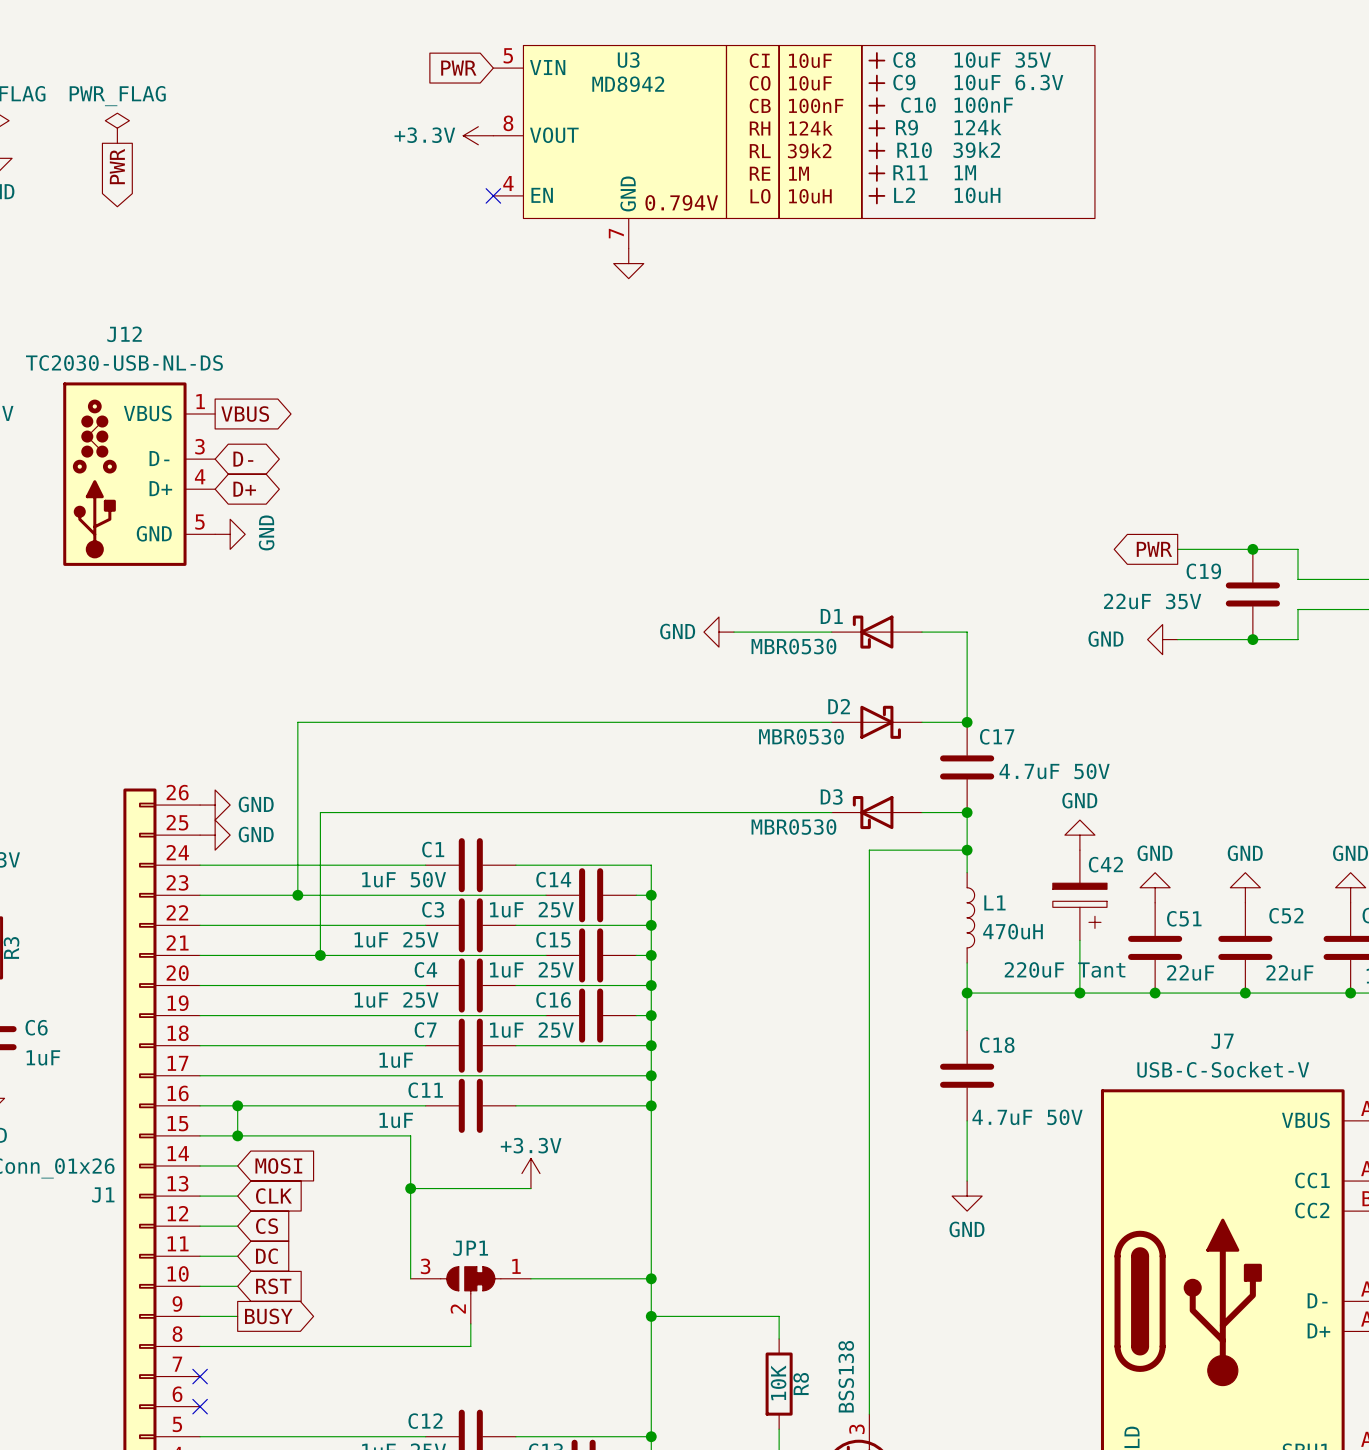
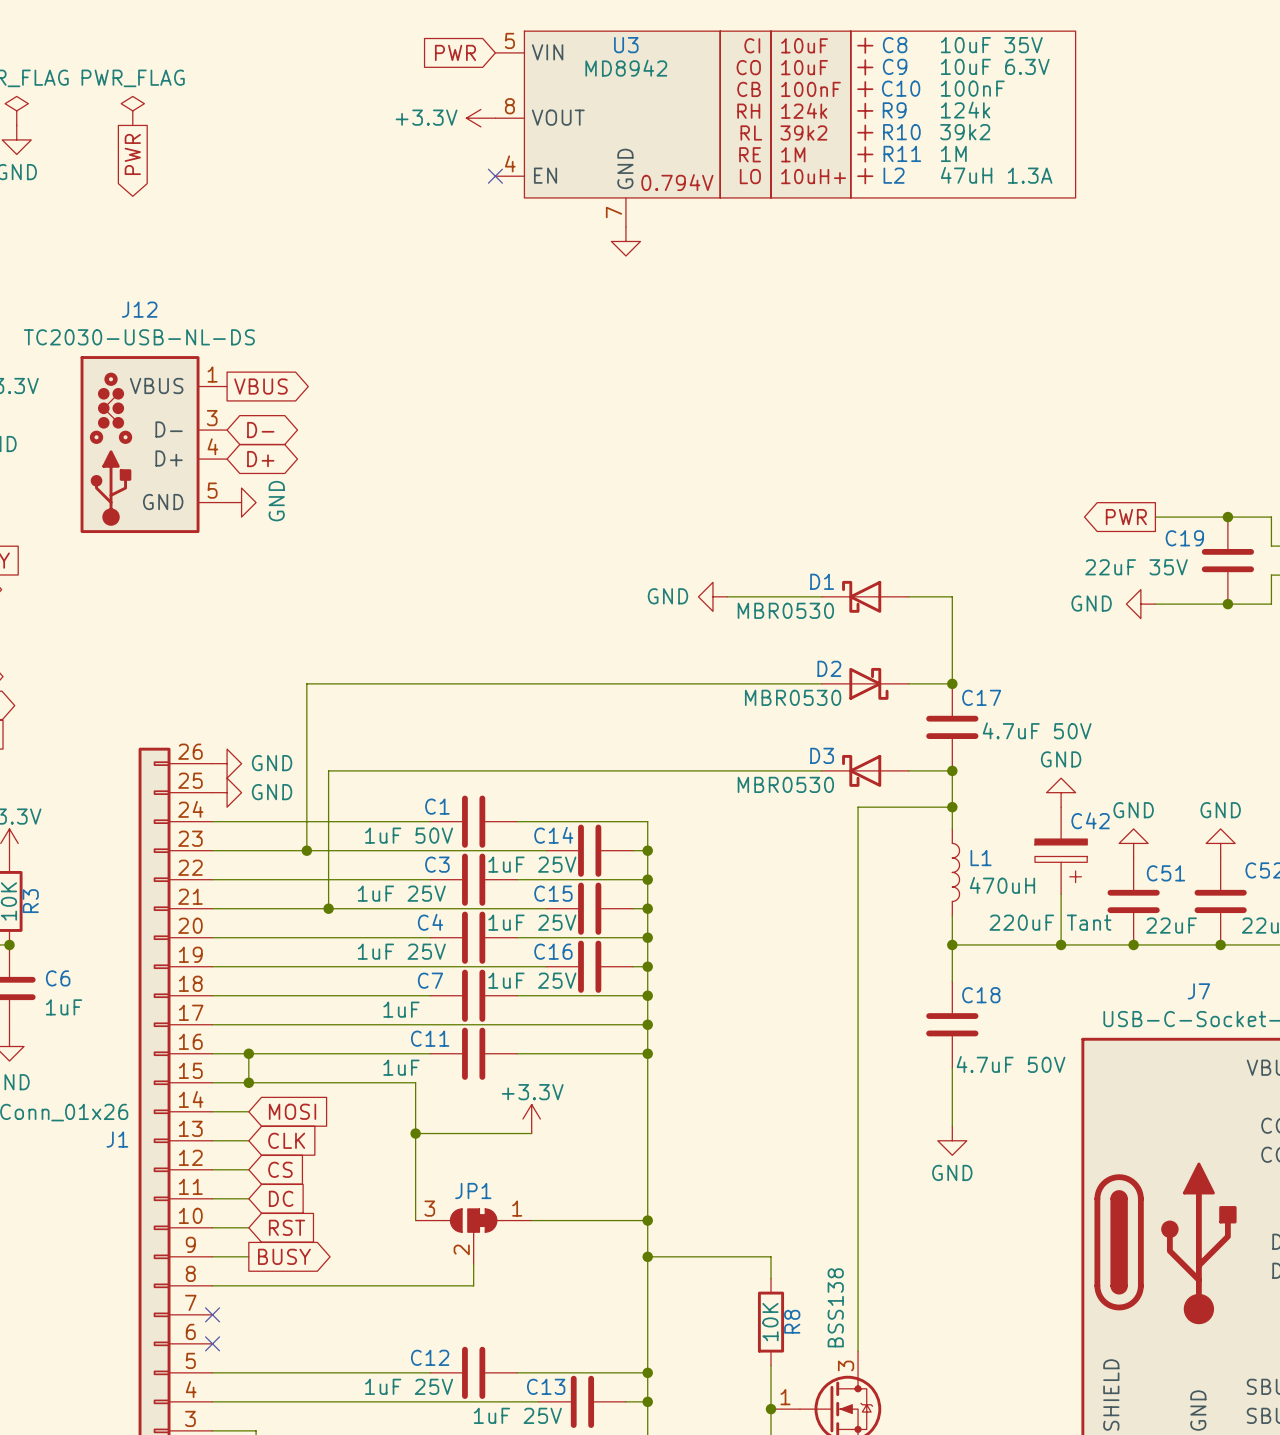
L2 value: 10uH (977, 195) -> 47uH 1.3A (996, 175)
U3 text: 10uH (810, 196) -> 10uH+ (813, 176)

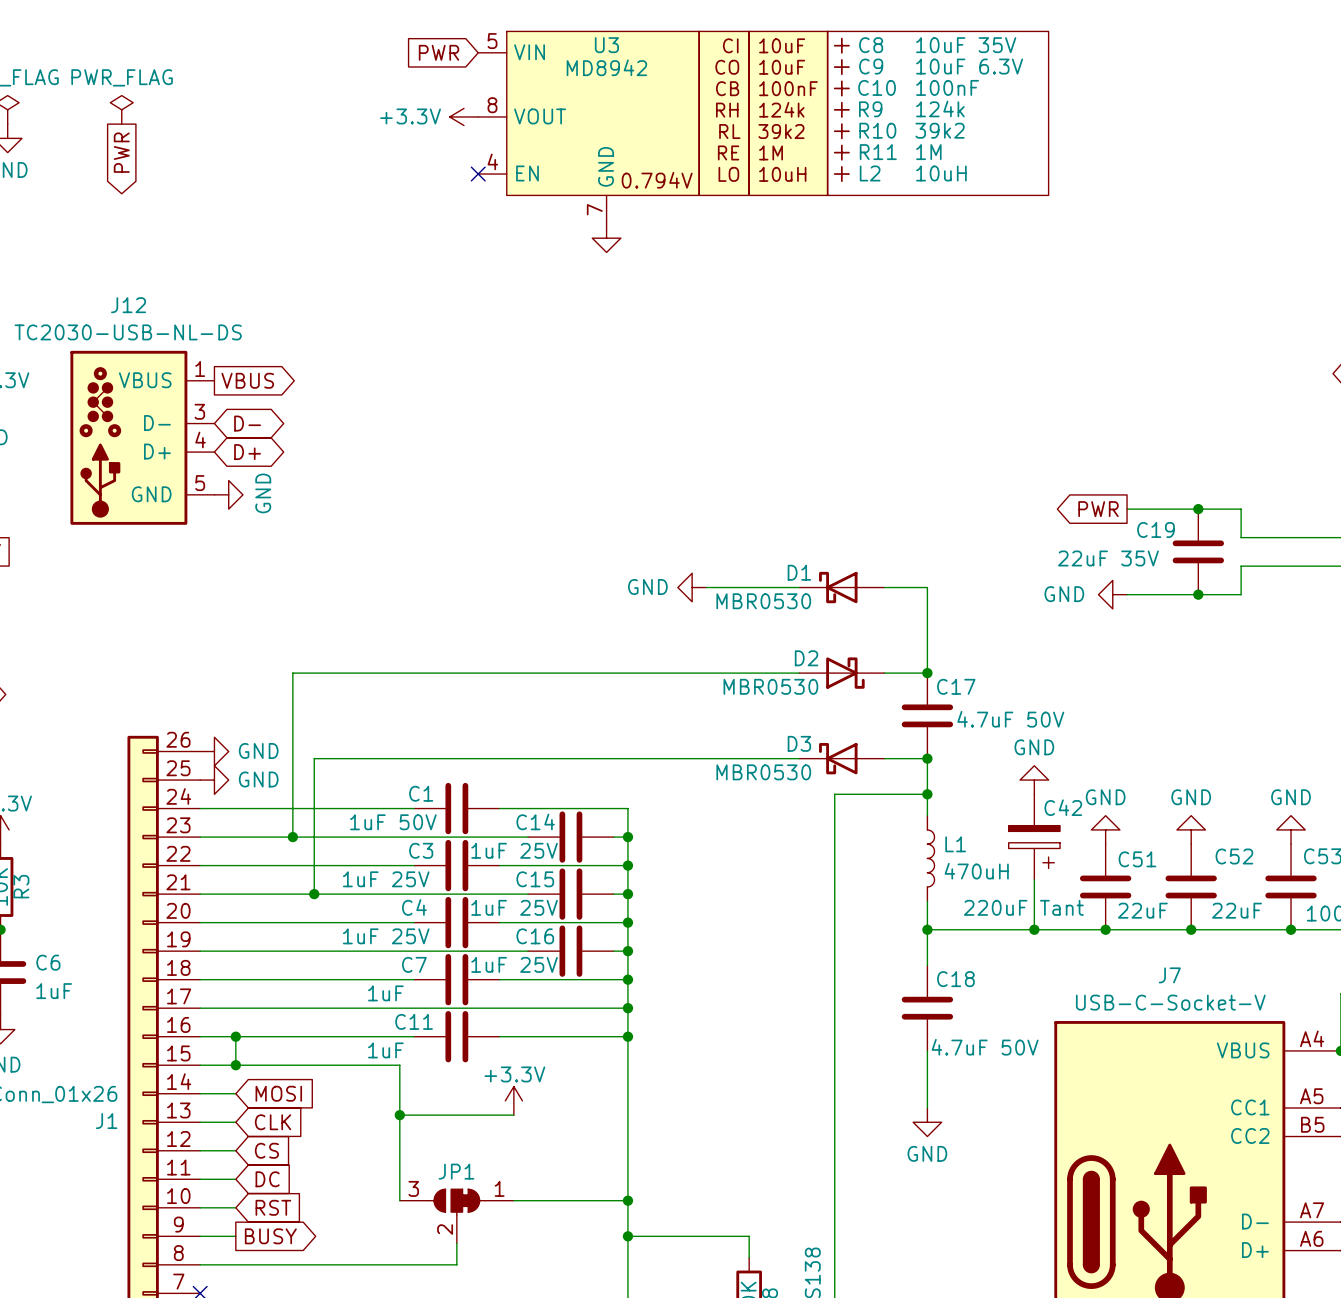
L2 value: 47uH 1.3A (996, 175) -> 10uH (941, 173)
U3 text: 10uH+ (813, 176) -> 10uH (782, 174)

